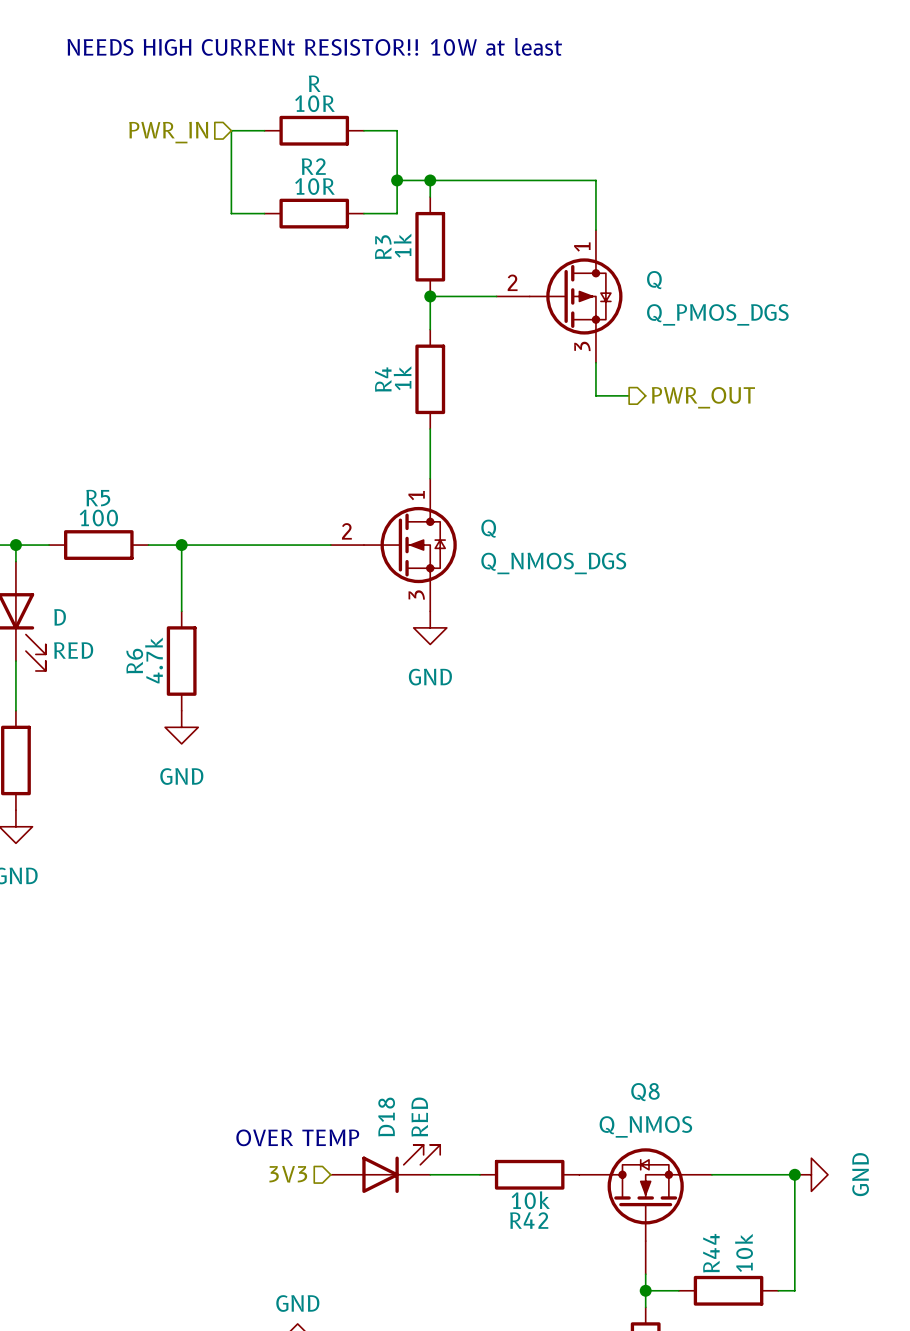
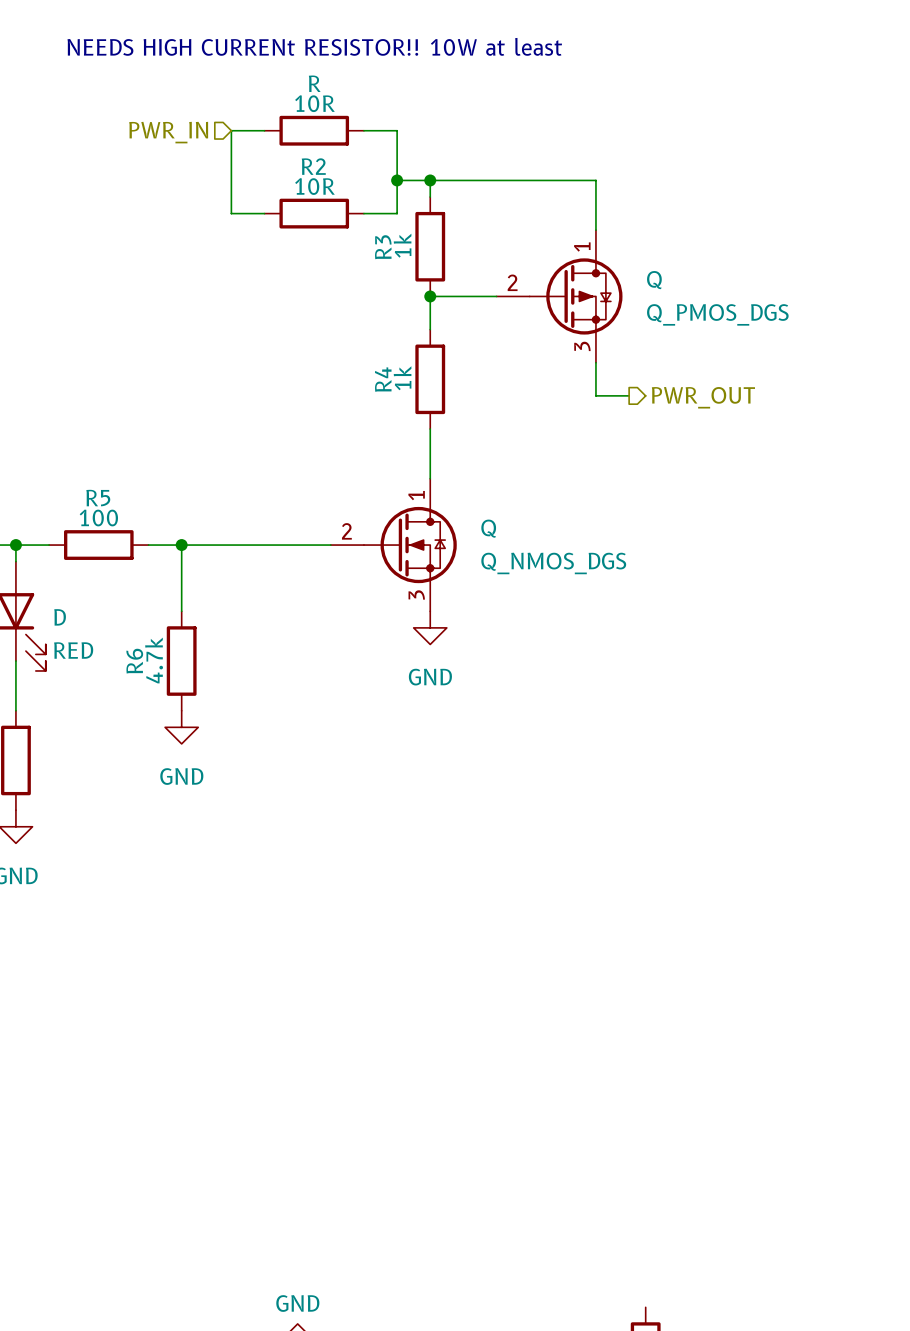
text: OVER TEMP (297, 1137) -> none
D18: RED (385, 1168) -> none
hierarchical label: 3V3 (288, 1174) -> none
wire: (430, 1174) (479, 1174) -> none
R42: 10k (529, 1174) -> none
wire: (711, 1174) (794, 1174) (794, 1290) (778, 1290) -> none
junction: (794, 1174) -> none
power symbol: GND (811, 1174) -> none
Q8: Q_NMOS (645, 1211) -> none
wire: (645, 1274) (645, 1307) -> none
wire: (645, 1290) (678, 1290) -> none
junction: (645, 1290) -> none
R44: 10k (728, 1290) -> none

